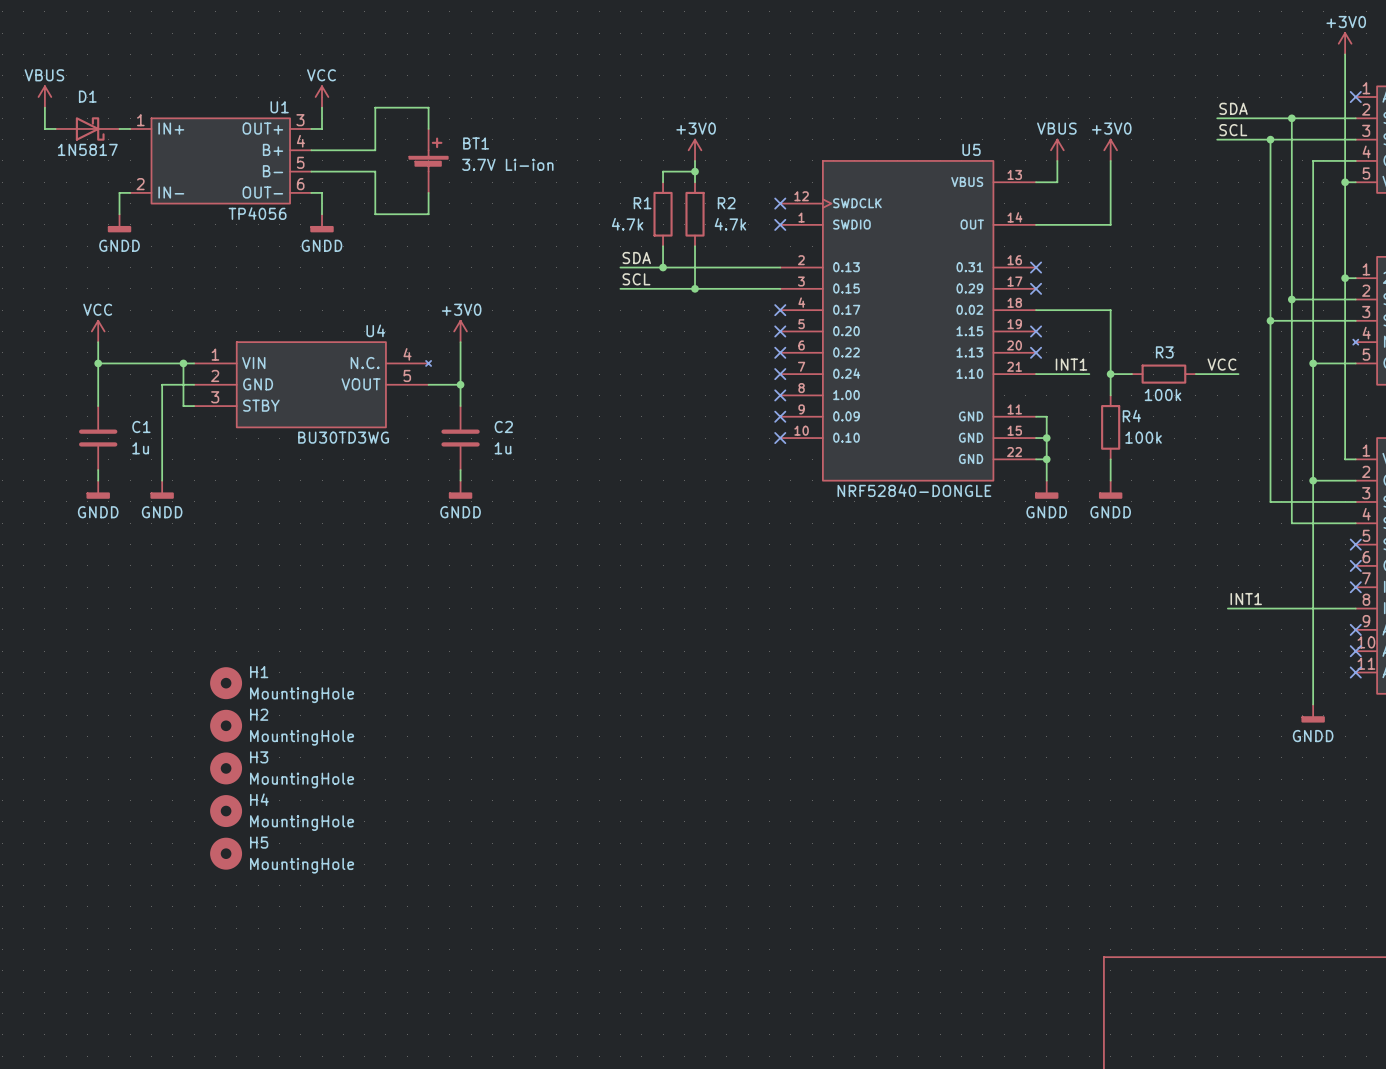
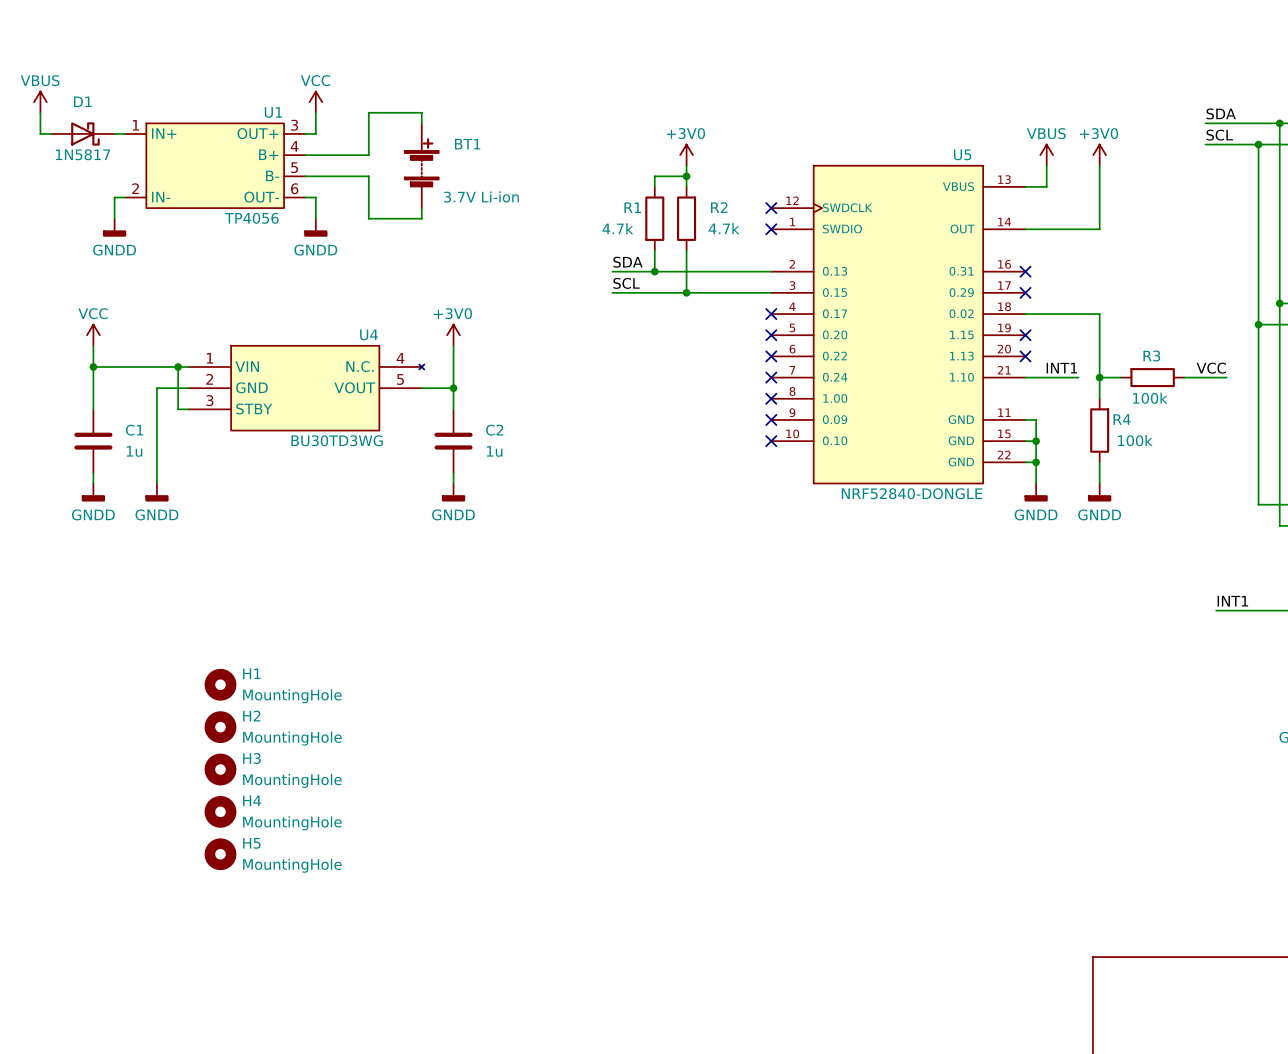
BT1 symbol: [409, 128, 448, 193] -> [404, 123, 439, 209]
BT1 value position: 3.7V Li-ion (507, 164) -> 3.7V Li-ion (481, 197)

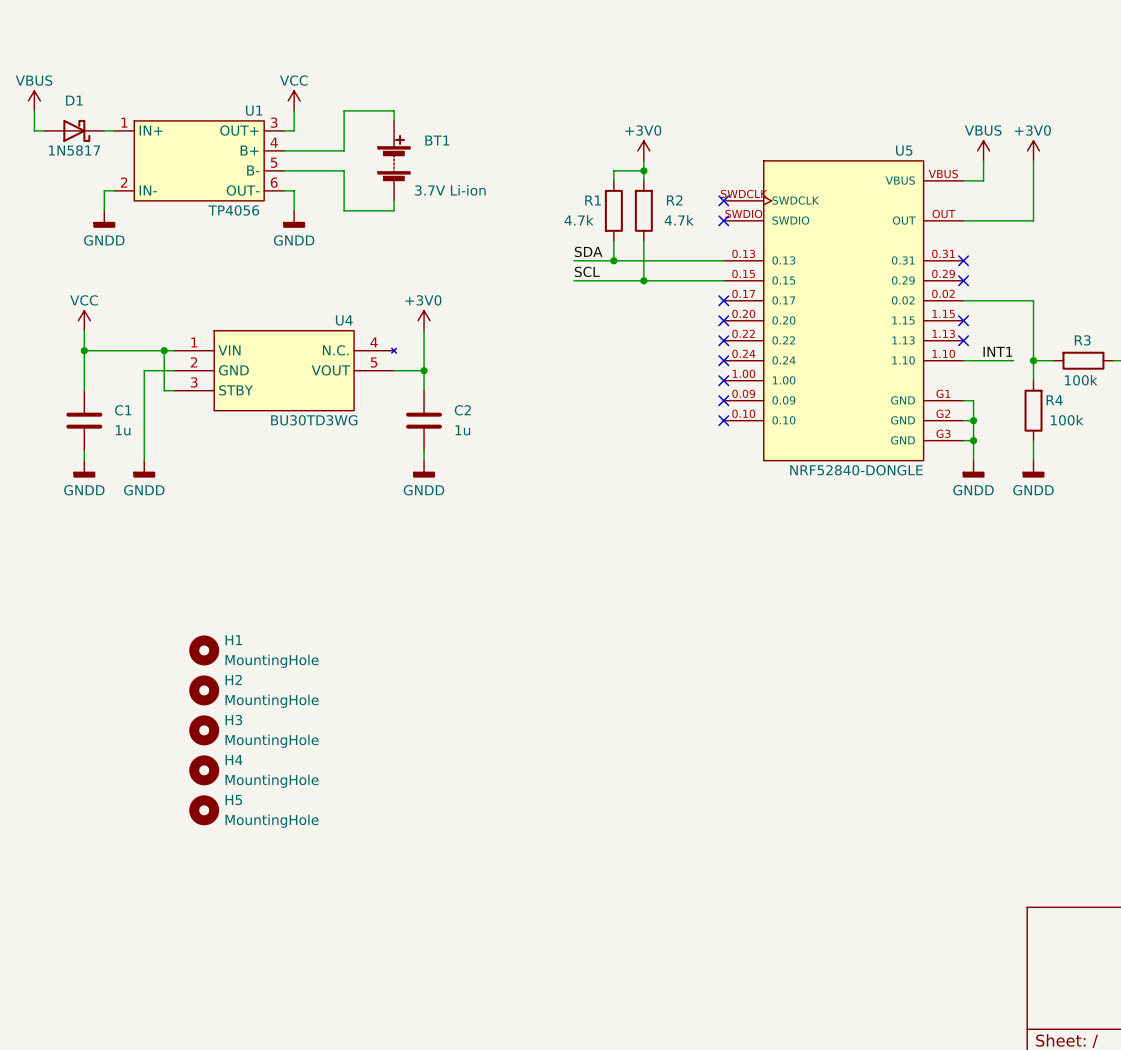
U5 symbol: [771, 165, 1026, 485] -> [723, 160, 964, 462]

